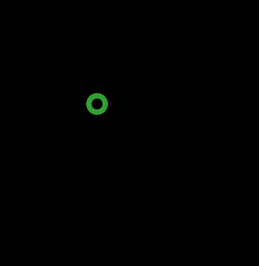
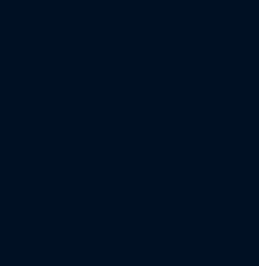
via: (97, 103) -> none

